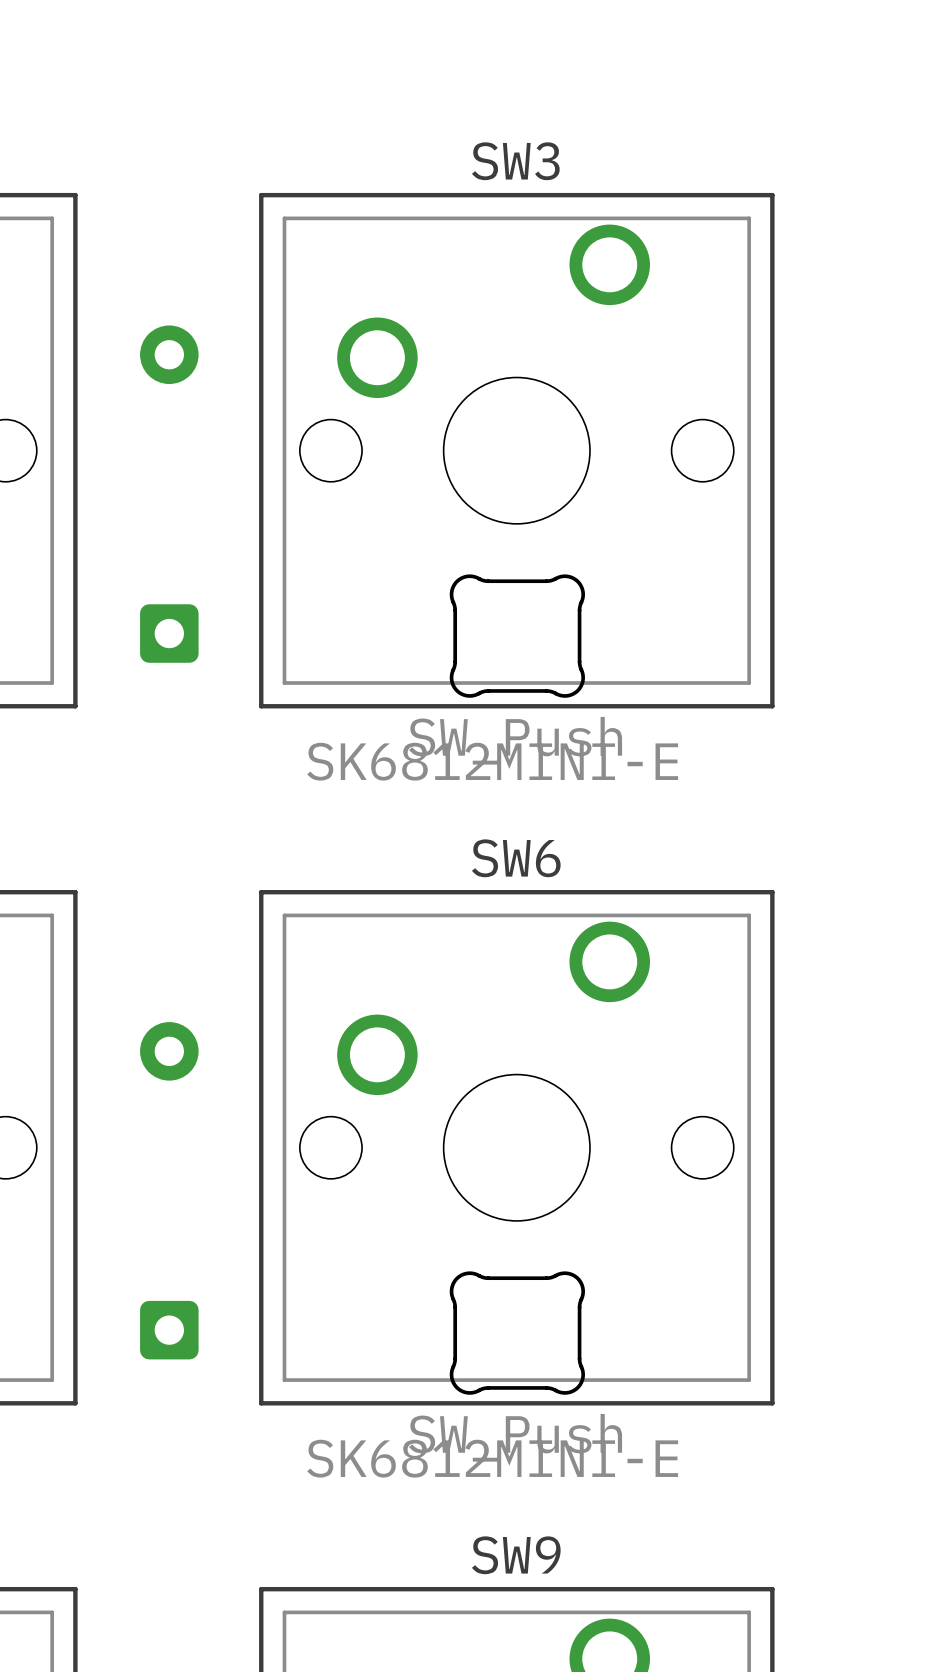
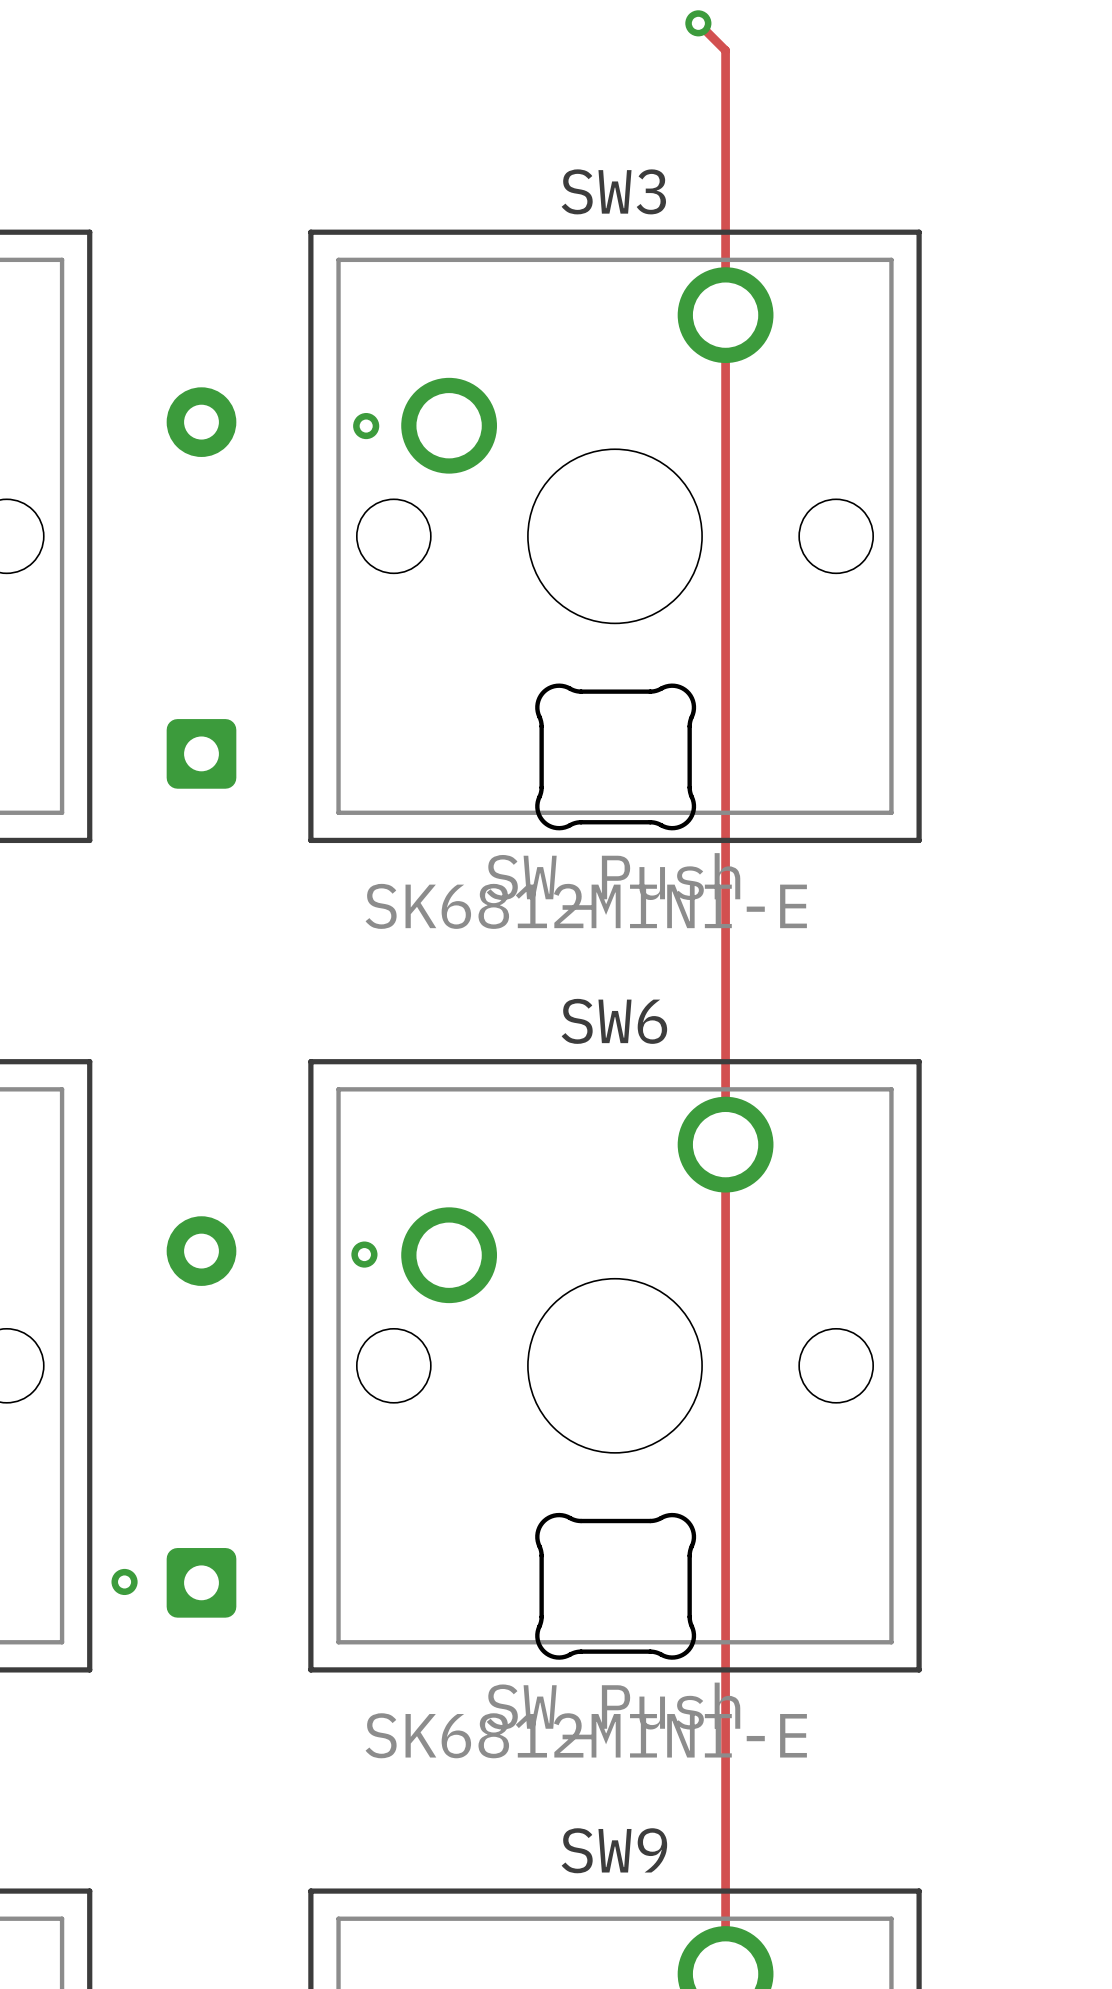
track: none -> (698, 23) (725, 50) (725, 1974)
via: none -> (698, 23)
via: none -> (366, 426)
via: none -> (364, 1254)
via: none -> (124, 1581)

